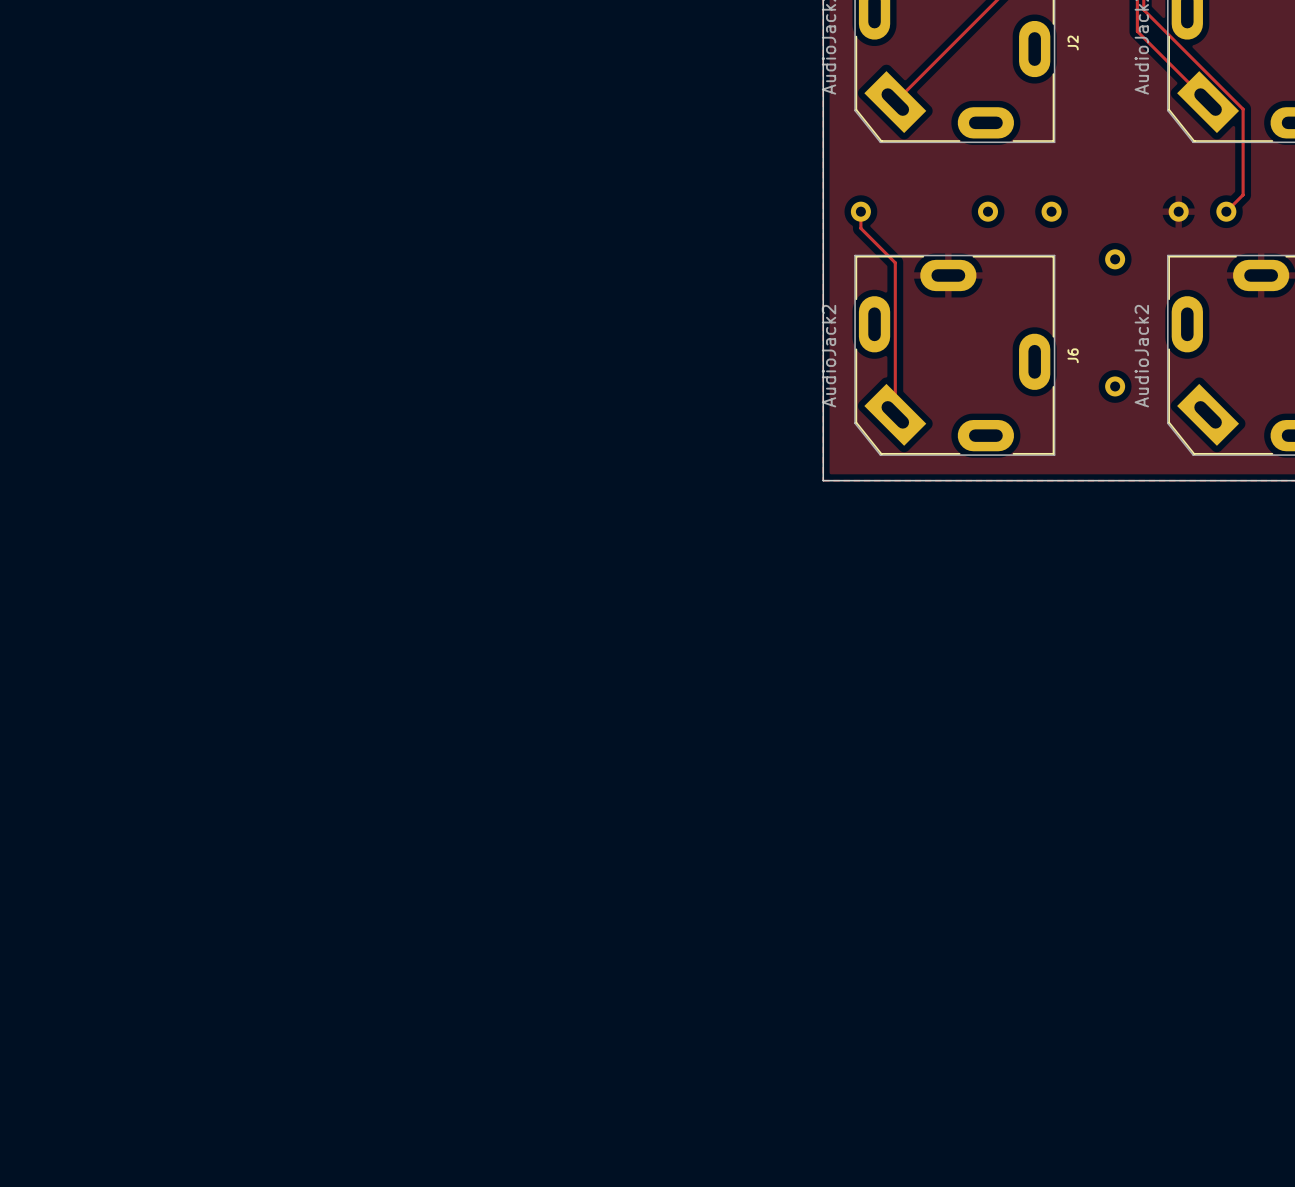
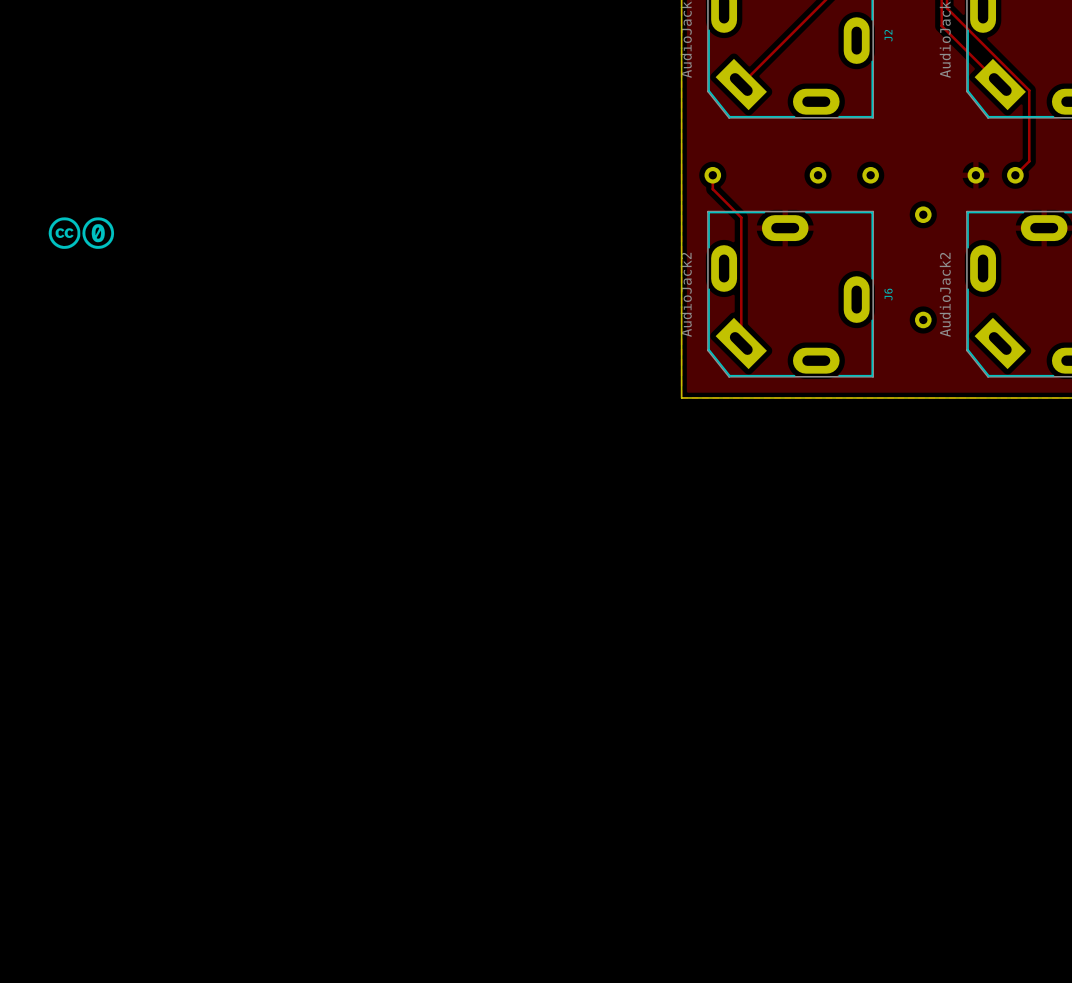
drawing: none -> [48, 217, 115, 249]

